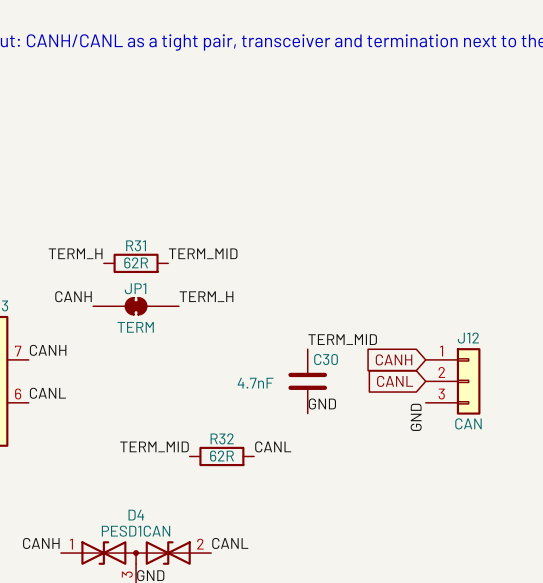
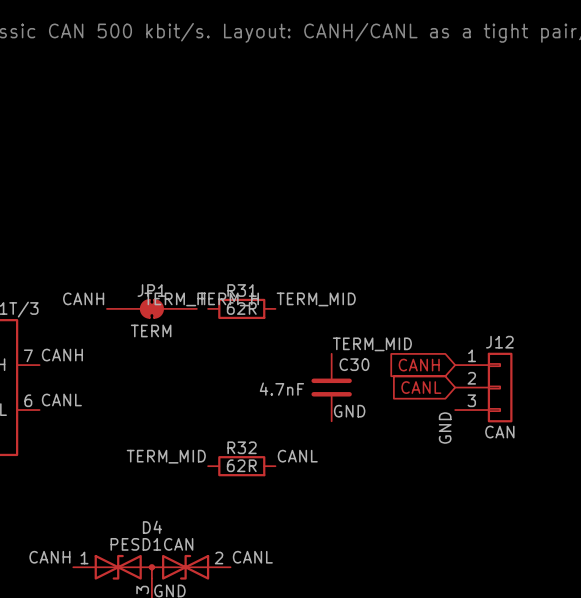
label position: TERM_H (75, 253) -> TERM_H (174, 299)
label position: TERM_MID (203, 253) -> TERM_MID (316, 299)
R31 position: (136, 263) -> (241, 308)

